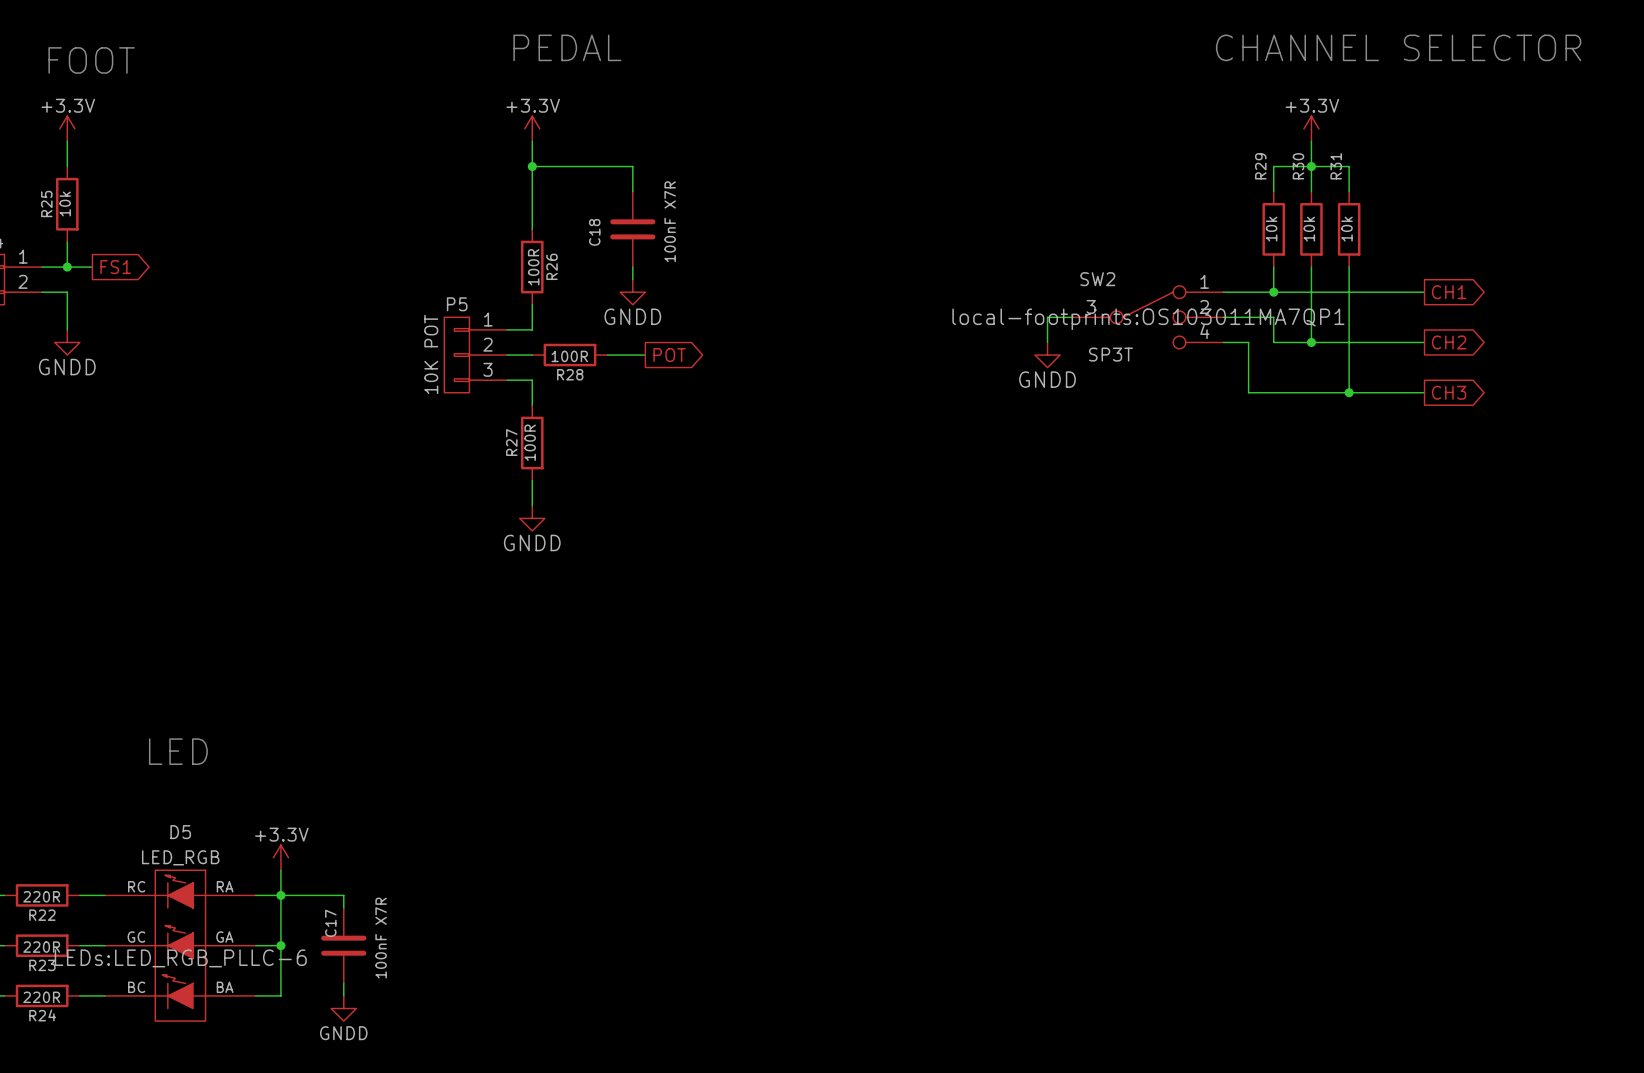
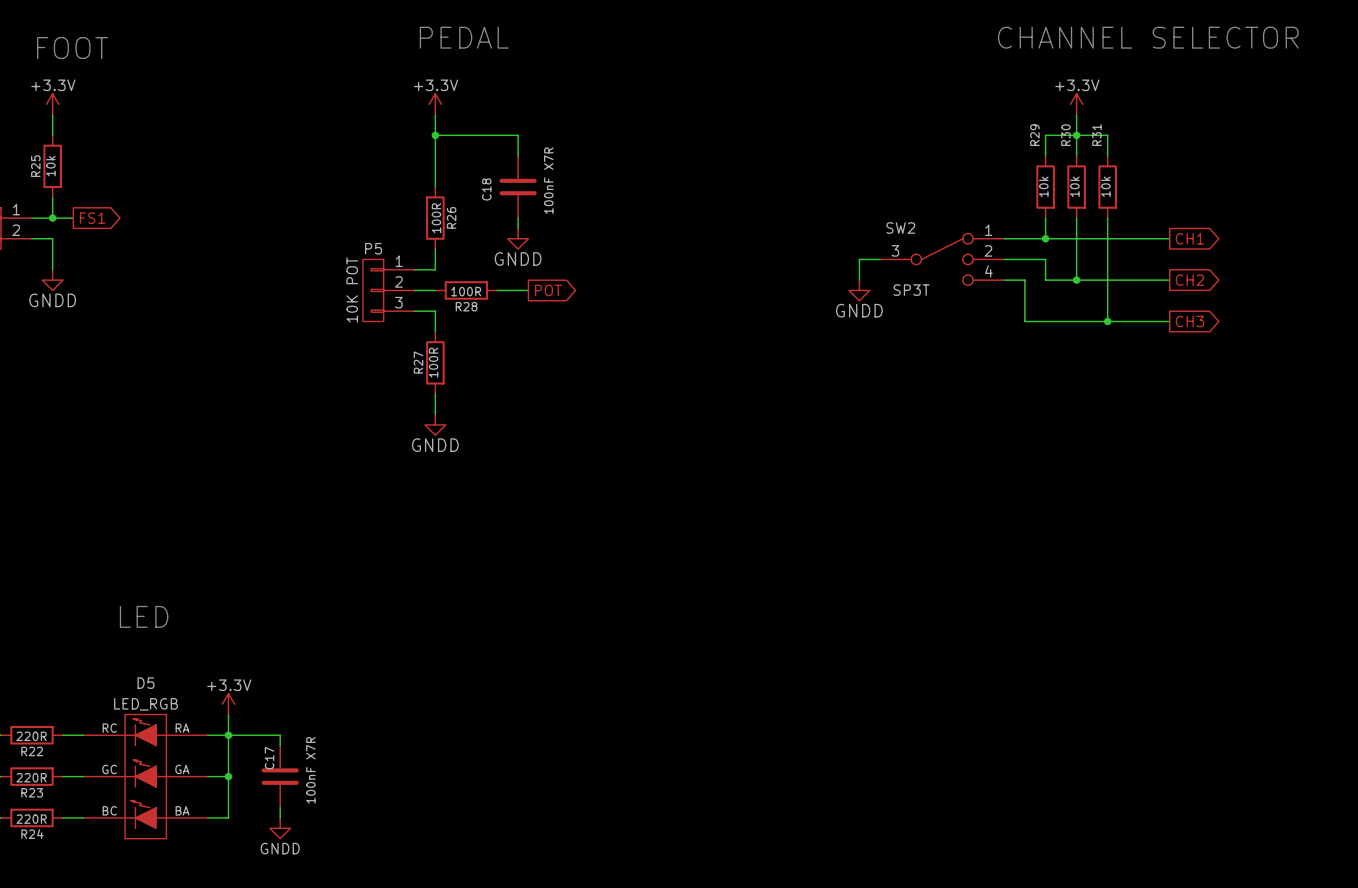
SW2 text: local-footprints:OS103011MA7QP1 (1148, 319) -> none
D5 text: LEDs:LED_RGB_PLLC-6 (180, 958) -> none

